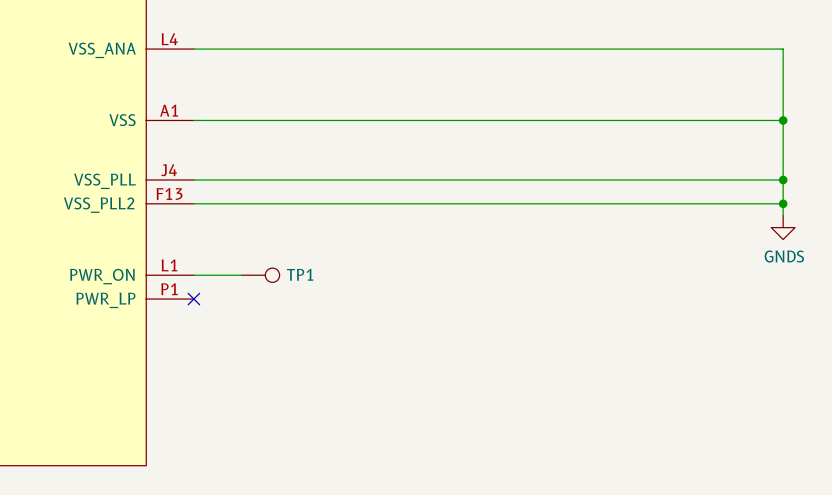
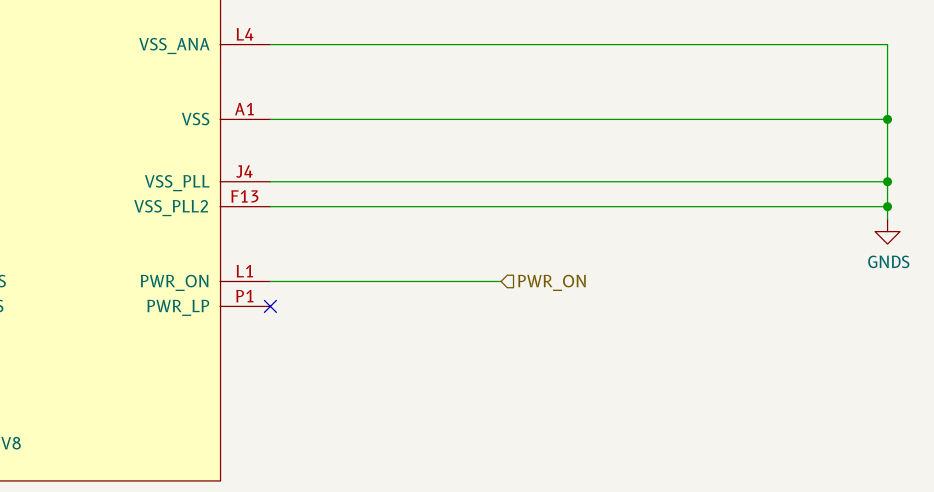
wire: none -> (320, 281) (501, 281)
TP1: (260, 275) -> none
hierarchical label: none -> PWR_ON (551, 282)

